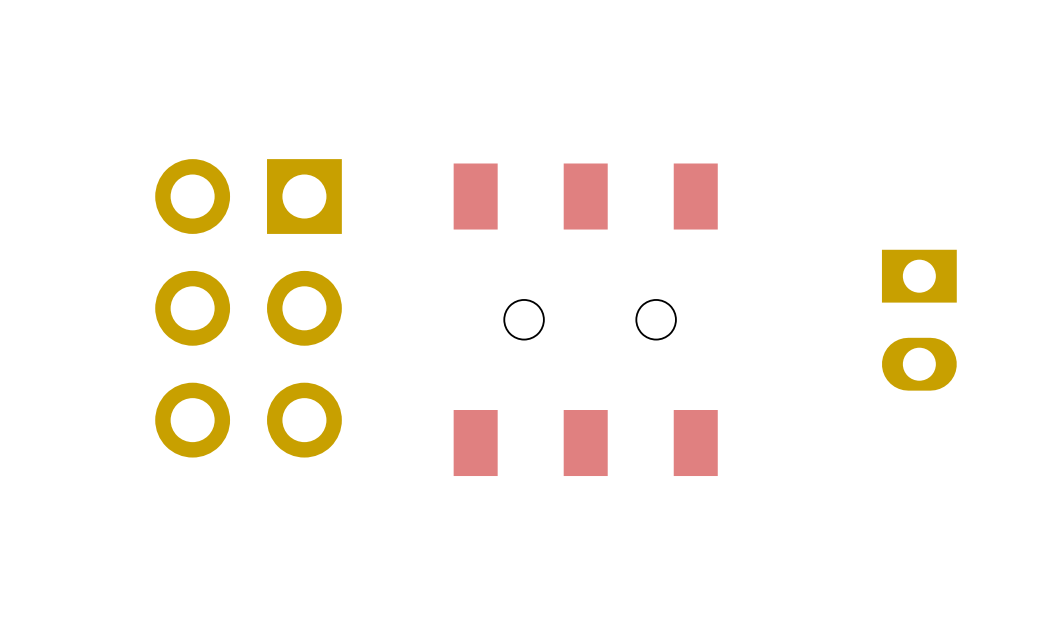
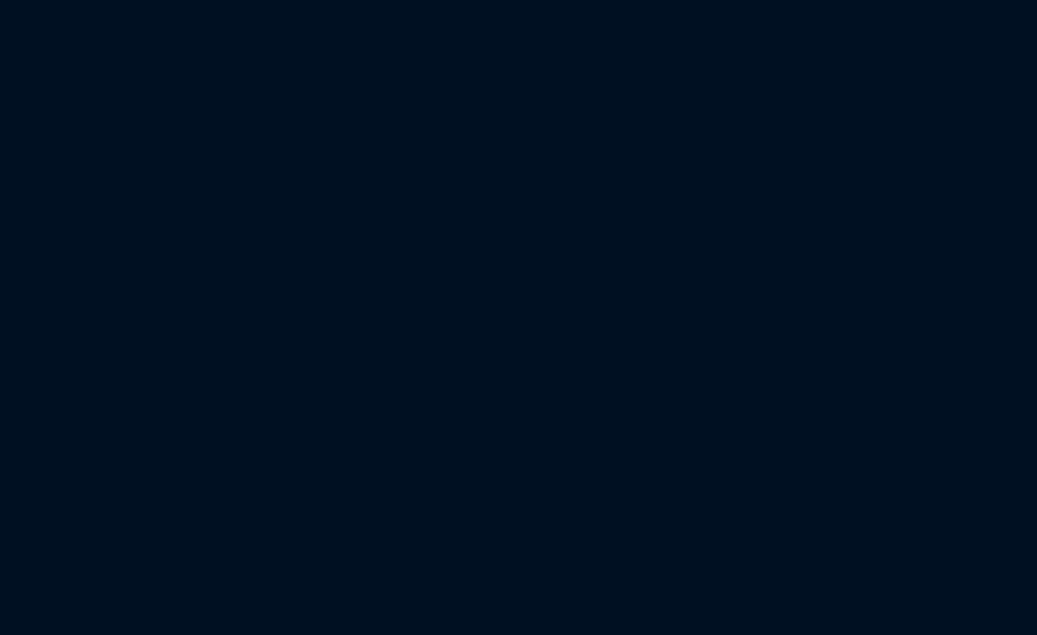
part: (248, 308) -> none
part: (585, 319) -> none
part: (919, 320) -> none

